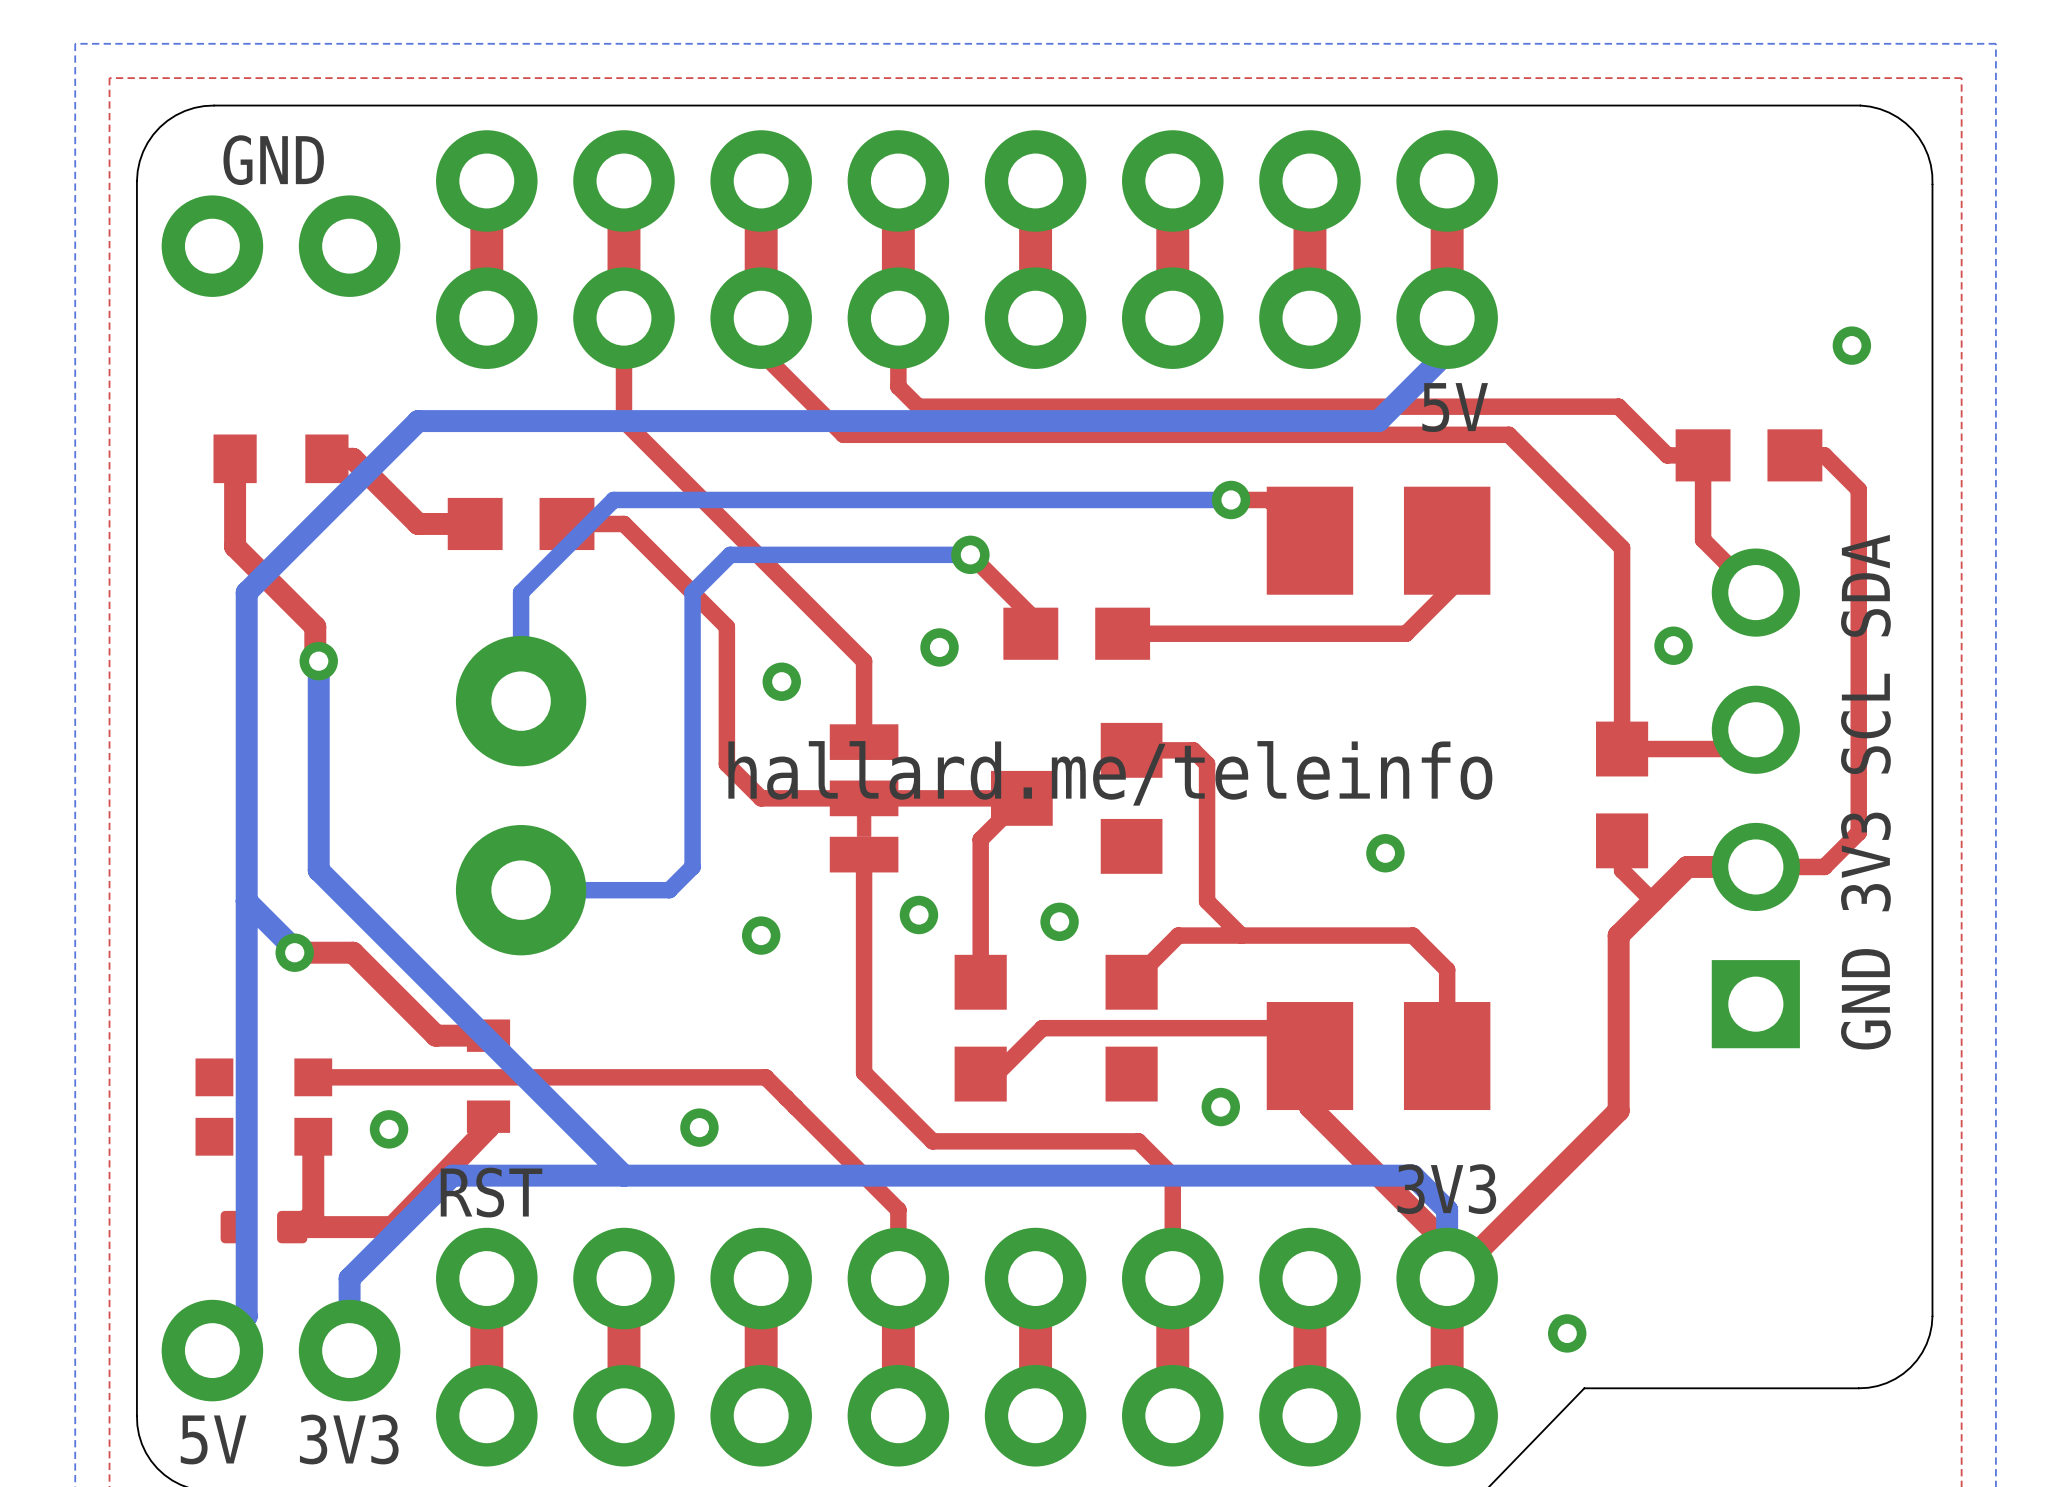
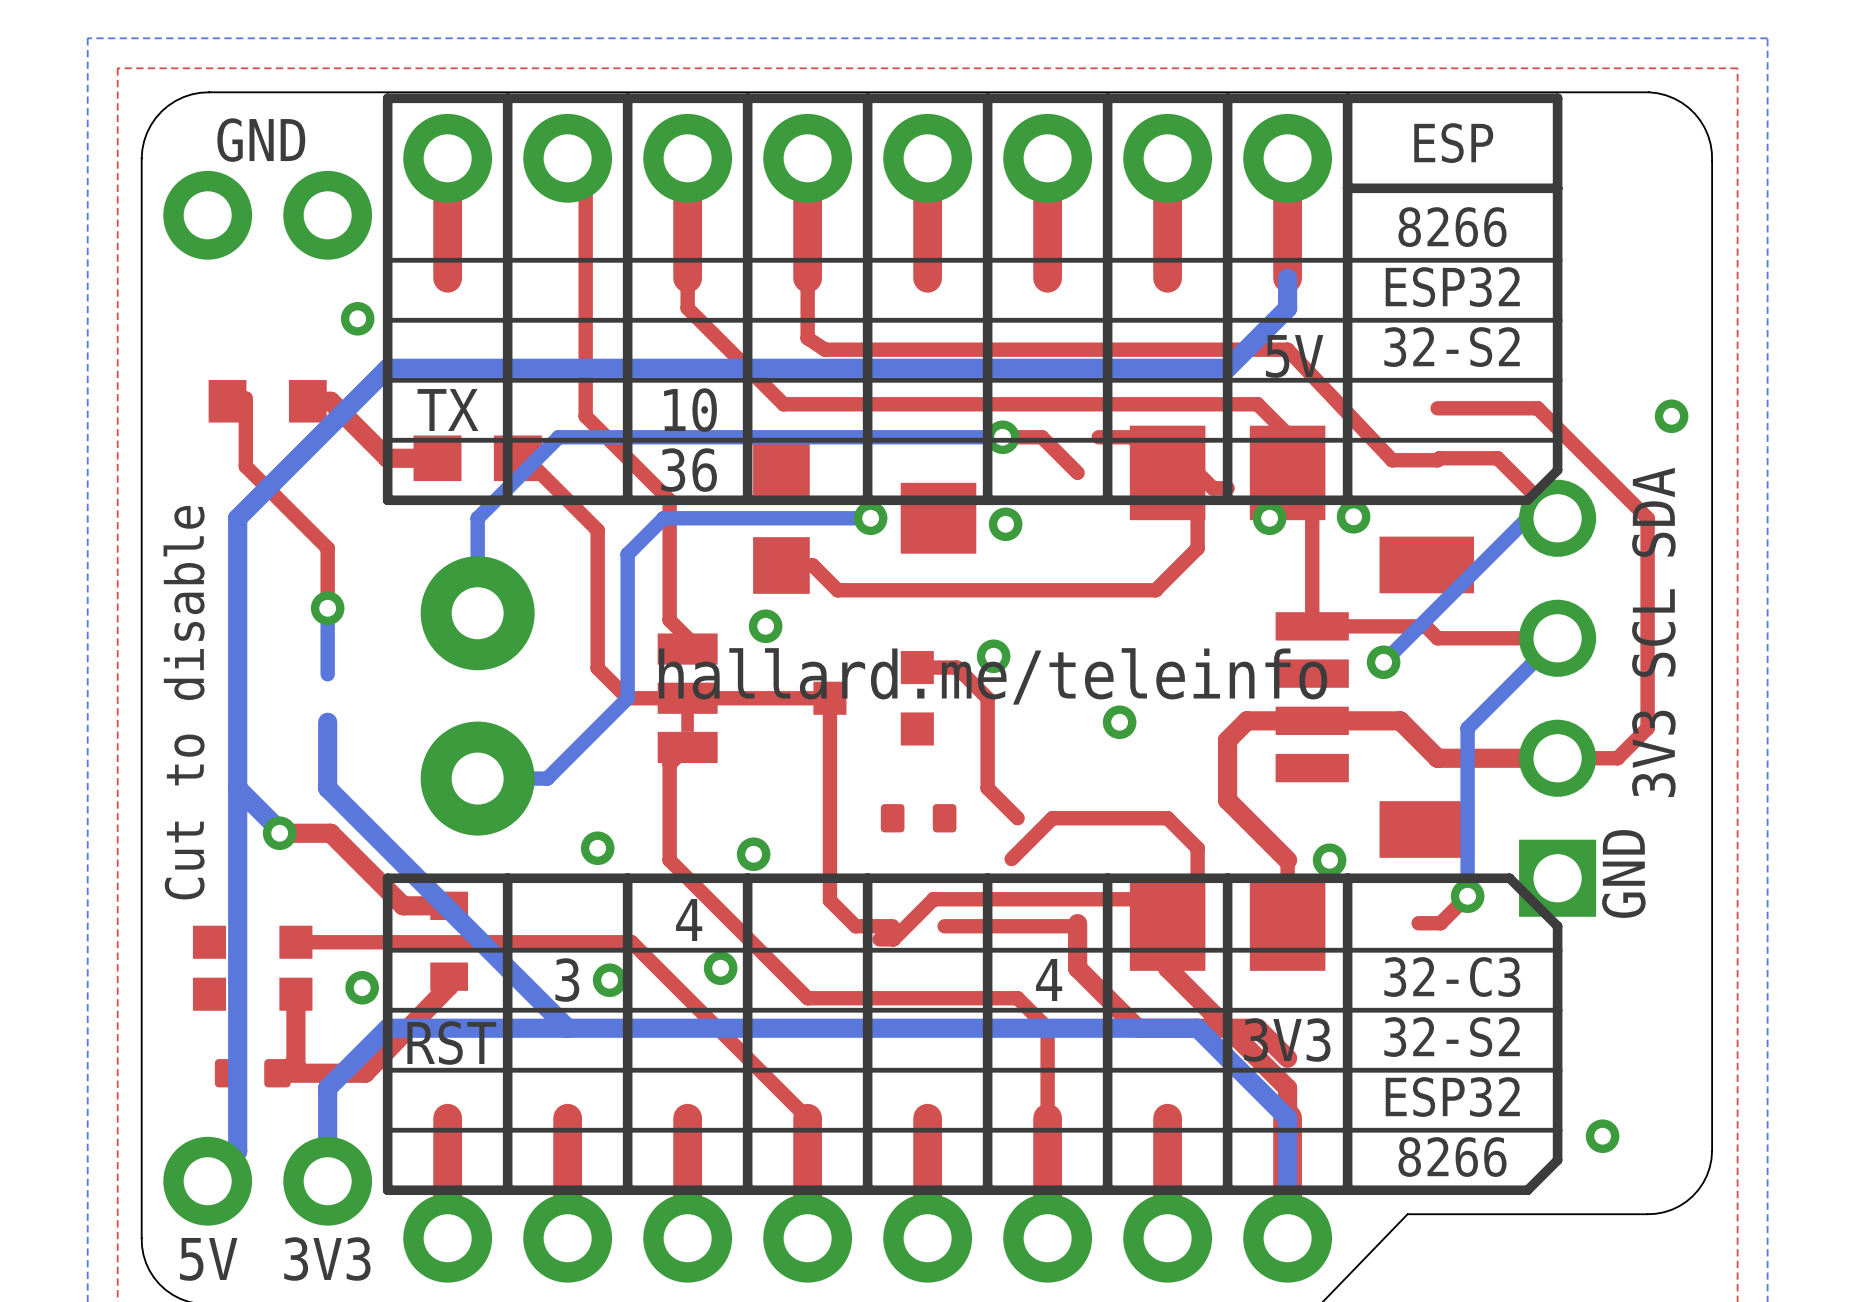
line: none -> (507, 98) (507, 500)
line: none -> (627, 98) (627, 500)
line: none -> (747, 98) (747, 500)
line: none -> (867, 98) (867, 500)
line: none -> (987, 98) (987, 500)
line: none -> (1107, 98) (1107, 500)
line: none -> (1227, 98) (1227, 500)
line: none -> (1347, 98) (1347, 500)
line: none -> (1557, 98) (387, 98) (387, 500) (1527, 500) (1557, 470) (1557, 98)
text: none -> ESP (1453, 143)
top track: (623, 180) (623, 421) (864, 661) (864, 742) -> (567, 158) (585, 176) (585, 416) (669, 500) (669, 620) (687, 638) (687, 649)
line: none -> (1557, 188) (1347, 188)
text: none -> 8266 (1452, 227)
line: none -> (1557, 260) (387, 260)
part: (966, 318) -> none
text: none -> ESP32 (1452, 287)
via position: (1851, 345) -> (1671, 416)
via: none -> (357, 318)
line: none -> (1557, 320) (387, 320)
top track: (898, 386) (918, 406) (1618, 406) (1667, 455) (1703, 455) (1703, 539) -> (807, 338) (825, 349) (1287, 349) (1392, 460) (1497, 458) (1511, 472)
text: none -> 32-S2 (1452, 347)
top track: (843, 434) (1508, 434) (1622, 547) (1622, 749) (1736, 749) (1755, 729) -> (759, 380) (783, 404) (1257, 404) (1312, 458) (1312, 626) (1425, 626) (1437, 638) (1557, 638)
line: none -> (1557, 380) (387, 380)
top track: none -> (245, 398) (245, 466) (327, 548) (327, 608)
part: (1748, 455) -> none
top track: (1794, 455) (1824, 455) (1858, 489) (1858, 592) -> (1437, 408) (1537, 408) (1647, 518)
top track: (235, 458) (235, 546) (315, 626) (315, 657) (318, 661) -> none
text: none -> TX (447, 410)
text: none -> 10 (690, 410)
top track: none -> (1002, 437) (1041, 437) (1077, 472)
via: none -> (1002, 437)
bottom track: (1231, 499) (1121, 499) -> none
via: (1231, 499) -> none
line: none -> (1557, 440) (387, 440)
top track: (575, 523) (623, 523) (726, 626) (726, 764) (761, 798) -> (525, 458) (597, 530) (597, 668) (627, 698) (687, 698)
text: none -> 36 (689, 470)
top track: (1447, 540) (1464, 558) (1481, 558) (1406, 633) (1122, 633) -> none
top track: (970, 554) (1030, 615) (1030, 633) -> none
bottom track: (970, 554) (730, 554) (692, 592) (692, 633) -> (870, 518) (663, 518) (627, 554)
via position: (970, 554) -> (870, 518)
top track: none -> (1227, 488) (1212, 488) (1197, 472) (1197, 548) (1155, 590) (837, 590) (812, 565) (781, 565)
via: none -> (1353, 516)
part: none -> (864, 518)
via: none -> (1269, 518)
bottom track: none -> (1557, 518) (1527, 518) (1383, 662)
via: none -> (1005, 524)
part: (1076, 633) -> none
via: (1673, 645) -> none
via: (939, 647) -> none
bottom track: (318, 661) (318, 870) (349, 901) -> (327, 722) (327, 788)
via position: (318, 661) -> (327, 608)
via: (781, 681) -> none
bottom track: none -> (327, 608) (327, 674)
via: none -> (765, 626)
bottom track: none -> (1557, 638) (1467, 728) (1467, 896)
via: none -> (993, 656)
top track: (1131, 750) (1193, 750) (1207, 764) (1207, 901) (1241, 935) -> none
via: none -> (1383, 662)
top track: none -> (917, 667) (956, 667) (987, 698) (987, 788) (1017, 818)
part: (1622, 794) -> none
part: none -> (1374, 697)
bottom track: (692, 798) (692, 866) (669, 890) (600, 890) -> (627, 698) (547, 778)
part position: (864, 798) -> (687, 698)
top track: (923, 798) (1021, 798) (980, 839) (980, 982) -> (829, 698) (829, 900) (855, 926) (892, 926)
part: none -> (873, 698)
part: (1076, 798) -> none
text: none -> Cut to disable (184, 702)
via: none -> (1119, 722)
top track: (1622, 840) (1622, 870) (1652, 901) -> none
via: (1385, 853) -> none
top track: (864, 854) (864, 1072) (932, 1141) -> (687, 747) (669, 764) (669, 860) (807, 998) (837, 998)
top track: (1687, 866) (1618, 935) (1618, 1110) (1447, 1282) -> (1497, 758) (1437, 758) (1400, 720) (1247, 720) (1227, 740) (1227, 800) (1287, 860)
via: (918, 914) -> none
via: (1059, 921) -> none
via: (761, 935) -> none
part: none -> (918, 818)
top track: (1309, 935) (1412, 935) (1447, 969) (1447, 983) -> (1167, 818) (1197, 848) (1197, 923)
via: none -> (597, 848)
via: none -> (753, 854)
via: none -> (1329, 860)
text position: GND (1865, 999) -> GND (1623, 873)
line: none -> (507, 878) (507, 1190)
line: none -> (627, 878) (627, 1190)
line: none -> (747, 878) (747, 1190)
line: none -> (867, 878) (867, 1190)
line: none -> (987, 878) (987, 1190)
line: none -> (1107, 878) (1107, 1190)
line: none -> (1227, 878) (1227, 1190)
line: none -> (1347, 878) (1347, 1190)
top track: none -> (1467, 896) (1440, 923) (1418, 923)
via: none -> (1467, 896)
part: (980, 1028) -> none
part: (1131, 1028) -> none
text: none -> 4 (689, 920)
top track: none -> (944, 926) (1074, 926) (1077, 923) (1077, 968) (1137, 1028) (1257, 1028) (1287, 1058)
top track: (697, 1077) (765, 1077) (898, 1209) (898, 1278) -> (631, 942) (807, 1118)
line: none -> (1557, 950) (387, 950)
via: none -> (720, 968)
via: (1220, 1107) -> none
text: none -> 32-C3 (1452, 977)
text: none -> 3 (567, 980)
text: none -> 4 (1049, 979)
via position: (699, 1127) -> (609, 980)
line: none -> (1557, 1010) (387, 1010)
bottom track: (452, 1175) (349, 1278) -> (417, 1028) (387, 1028) (327, 1088) (327, 1118)
bottom track: (1344, 1175) (1412, 1175) (1447, 1209) (1447, 1278) -> (1197, 1028) (1287, 1118) (1287, 1238)
text: none -> 32-S2 (1452, 1037)
line: none -> (1557, 1070) (387, 1070)
text: none -> ESP32 (1452, 1097)
part: (966, 1278) -> none
line: none -> (1557, 1130) (1557, 926) (1509, 878) (387, 878) (387, 1190) (1527, 1190) (1557, 1160) (1557, 1130)
line: none -> (1557, 1130) (387, 1130)
via: none -> (1602, 1136)
text: none -> 8266 (1452, 1157)
via: (1567, 1333) -> none

